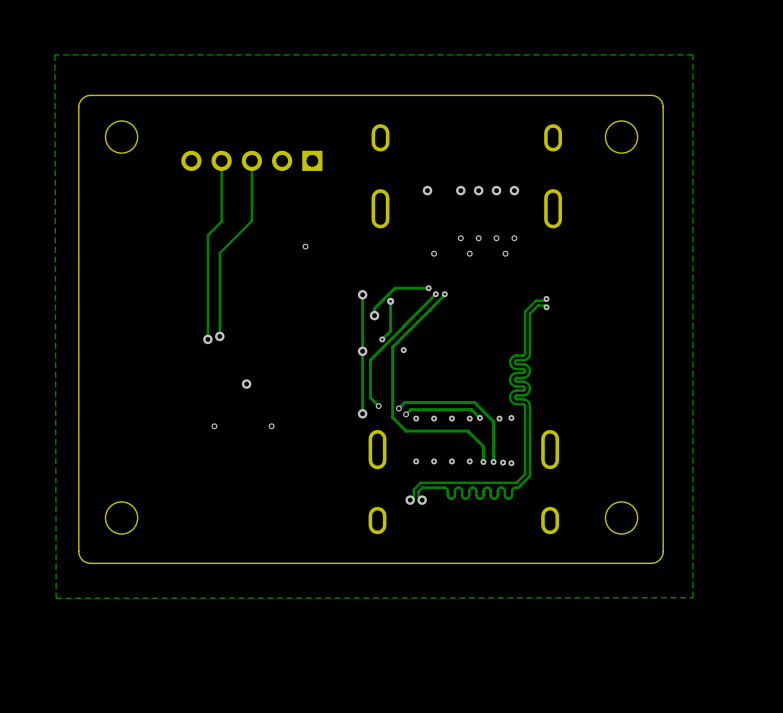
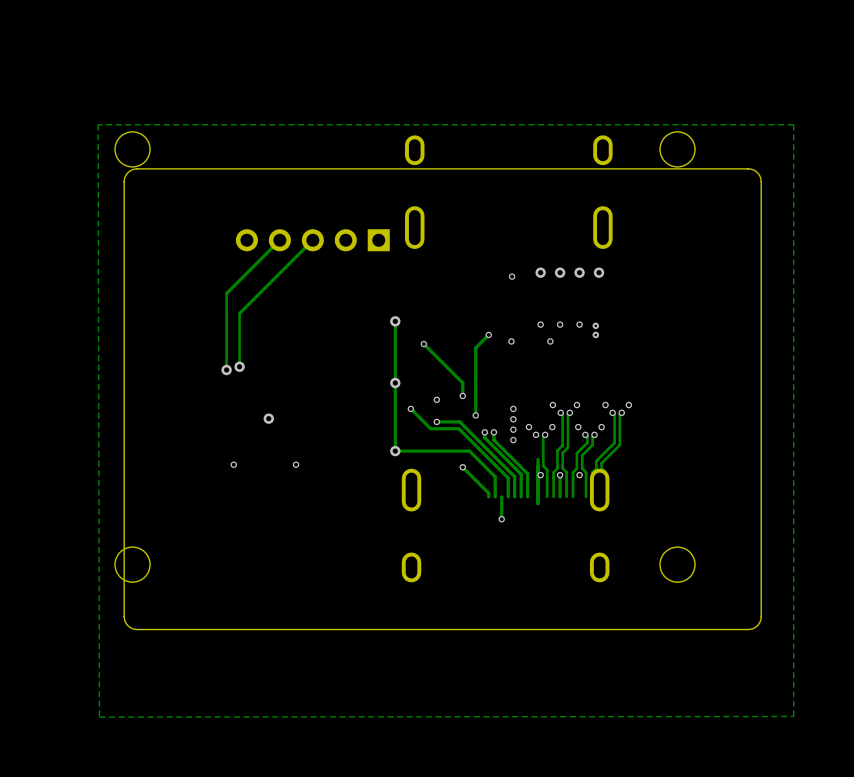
zone outline: (692, 54) (692, 597) (56, 598) (54, 54) (692, 54) -> (793, 124) (793, 716) (99, 717) (98, 124) (793, 124)
board edge: (651, 95) (90, 95) (83, 97) (78, 107) (78, 551) (81, 558) (90, 563) (651, 563) (658, 560) (663, 551) (663, 107) (659, 98) (651, 95) -> (748, 168) (757, 172) (761, 181) (761, 616) (756, 626) (748, 629) (137, 629) (126, 624) (124, 616) (124, 181) (129, 171) (137, 168) (748, 168)
track: (221, 160) (221, 221) (207, 235) (207, 269) -> (279, 240) (226, 293)
track: (251, 160) (251, 221) (219, 253) (219, 287) -> (312, 240) (239, 313)
part position: (251, 160) -> (312, 240)
via: (427, 190) -> none
via: (460, 190) -> none
via: (478, 190) -> none
via: (496, 190) -> none
via: (514, 190) -> none
via: (460, 238) -> none
via: (478, 238) -> none
via: (496, 238) -> none
via: (514, 238) -> none
via: (305, 246) -> none
via: none -> (540, 272)
via: none -> (560, 272)
via: none -> (579, 272)
via: none -> (599, 272)
via: (434, 253) -> none
via: (505, 253) -> none
track: (428, 288) (394, 288) (374, 308) (374, 315) -> none
via: (428, 288) -> none
track: (435, 294) (370, 360) (370, 397) (378, 406) -> none
via: (435, 294) -> none
track: (444, 294) (392, 347) (392, 417) (406, 431) (467, 431) (483, 446) (483, 462) -> none
via: (444, 294) -> none
via: none -> (540, 324)
via: none -> (560, 324)
via: none -> (579, 324)
track: (546, 298) (536, 300) (525, 311) (525, 353) (513, 356) (510, 361) (513, 368) (525, 370) (511, 376) (510, 381) (512, 385) (525, 388) (513, 391) (510, 397) (513, 403) (525, 405) (525, 474) (516, 482) (420, 482) (413, 489) (413, 496) (410, 500) -> none
track: (390, 301) (390, 331) (382, 339) -> none
via: (390, 301) -> none
track: none -> (488, 334) (475, 347) (475, 415)
via: none -> (488, 334)
track: (546, 307) (538, 305) (529, 313) (529, 355) (526, 359) (514, 361) (516, 364) (526, 365) (529, 370) (526, 376) (514, 379) (527, 383) (529, 391) (525, 394) (516, 395) (514, 397) (516, 399) (526, 399) (529, 404) (529, 476) (518, 487) (513, 488) (511, 496) (509, 498) (505, 497) (504, 489) (501, 487) (498, 489) (497, 496) (494, 498) (491, 496) (490, 489) (487, 487) (484, 489) (483, 496) (479, 498) (476, 496) (475, 489) (471, 487) (468, 496) (465, 498) (462, 496) (461, 489) (457, 487) (455, 489) (454, 496) (451, 498) (448, 496) (445, 487) (422, 487) (418, 491) (418, 496) (422, 500) -> none
via: none -> (511, 341)
via: none -> (550, 341)
via: (374, 315) -> none
track: none -> (423, 344) (462, 382) (462, 395)
via: none -> (423, 344)
via: (382, 339) -> none
via: (403, 350) -> none
via: none -> (462, 395)
via: none -> (436, 399)
via: none -> (552, 405)
via: none -> (576, 405)
via: none -> (605, 405)
via: none -> (628, 405)
track: none -> (410, 408) (430, 428) (458, 428) (508, 478) (508, 496)
via: none -> (410, 408)
via: none -> (513, 408)
track: none -> (560, 412) (562, 414) (562, 445) (557, 450) (557, 468) (553, 472) (553, 496)
via: none -> (560, 412)
track: none -> (569, 412) (567, 414) (567, 447) (562, 452) (562, 468) (566, 472) (566, 496)
via: none -> (569, 412)
track: none -> (612, 412) (614, 414) (614, 442) (596, 461) (596, 468) (592, 472) (592, 496)
via: none -> (612, 412)
track: none -> (621, 412) (619, 414) (619, 445) (601, 463) (601, 468) (605, 472) (605, 496)
via: none -> (621, 412)
via: none -> (475, 415)
via: none -> (513, 419)
track: none -> (436, 421) (459, 421) (514, 476) (514, 496)
via: none -> (436, 421)
via: none -> (528, 427)
via: none -> (552, 427)
via: none -> (578, 427)
via: none -> (601, 427)
via: none -> (513, 429)
track: none -> (484, 432) (484, 437) (521, 474) (521, 496)
via: none -> (484, 432)
track: none -> (493, 432) (493, 440) (527, 473) (527, 496)
via: none -> (493, 432)
via: none -> (536, 434)
track: none -> (545, 434) (543, 436) (543, 466) (547, 469) (547, 496)
via: none -> (545, 434)
track: none -> (585, 434) (587, 442) (576, 453) (576, 468) (573, 472) (573, 496)
via: none -> (585, 434)
track: none -> (594, 434) (592, 436) (592, 445) (582, 455) (582, 468) (586, 472) (586, 496)
via: none -> (594, 434)
via: none -> (513, 440)
via: (378, 406) -> none
track: (398, 408) (404, 402) (474, 402) (493, 421) -> none
via: (398, 408) -> none
track: none -> (395, 451) (469, 451) (495, 476) (495, 496)
track: (406, 414) (410, 409) (471, 409) (479, 417) -> none
via: (406, 414) -> none
via: (479, 417) -> none
via: (511, 417) -> none
via: (416, 418) -> none
via: (434, 418) -> none
via: (451, 418) -> none
via: (469, 418) -> none
via: (499, 418) -> none
track: none -> (462, 467) (488, 493) (488, 496)
via: none -> (462, 467)
via: none -> (540, 475)
track: none -> (560, 475) (560, 496)
via: none -> (560, 475)
via: none -> (579, 475)
track: none -> (501, 496) (501, 519)
via: (416, 461) -> none
via: (434, 461) -> none
via: (451, 461) -> none
via: (469, 461) -> none
via: (483, 462) -> none
via: (493, 462) -> none
via: (503, 462) -> none
via: (511, 463) -> none
via: none -> (501, 519)
via: (410, 500) -> none
via: (422, 500) -> none

